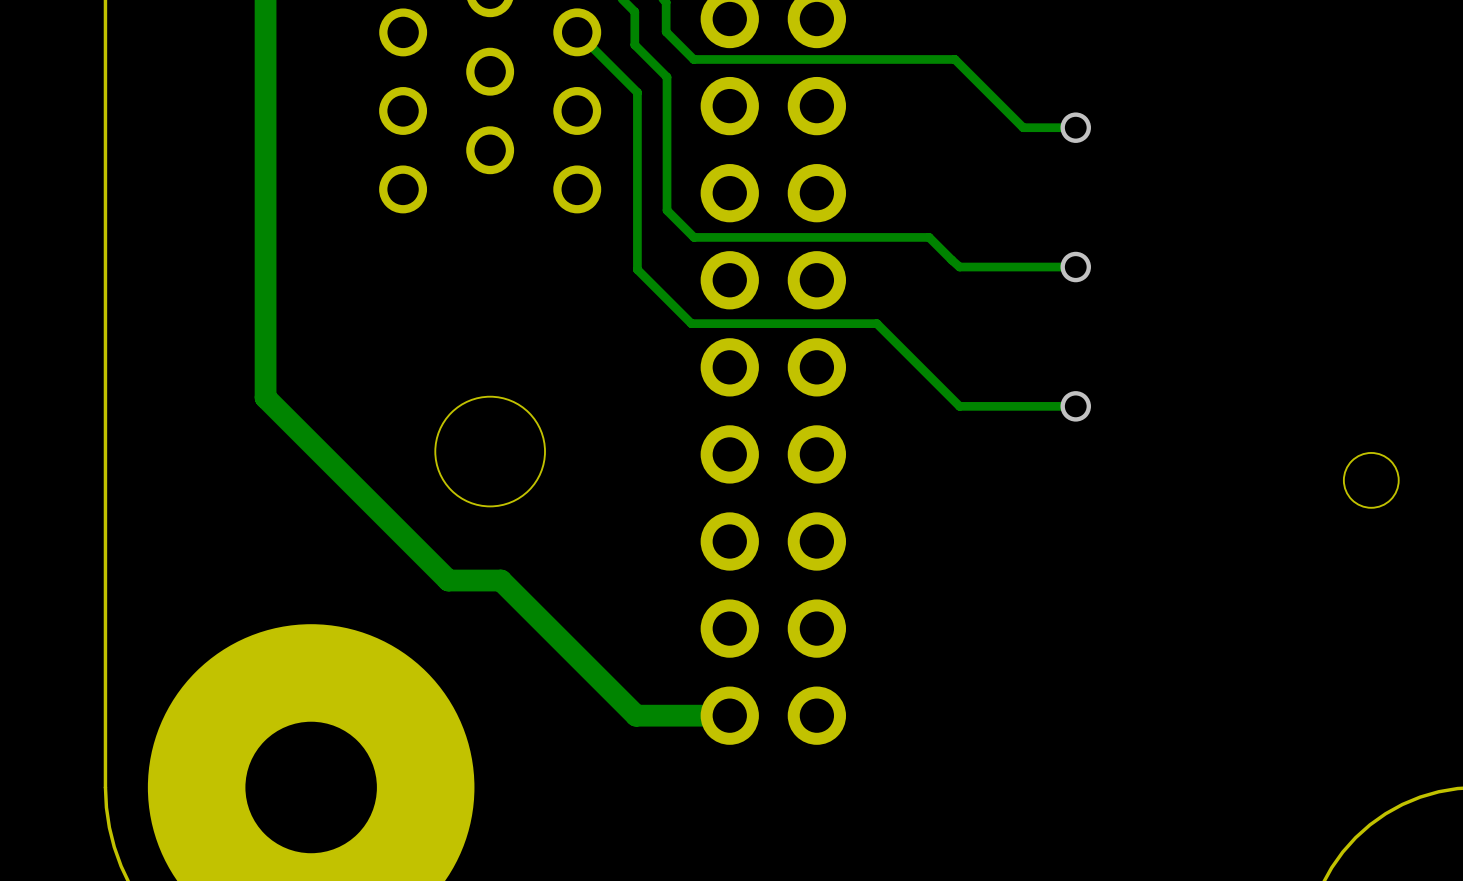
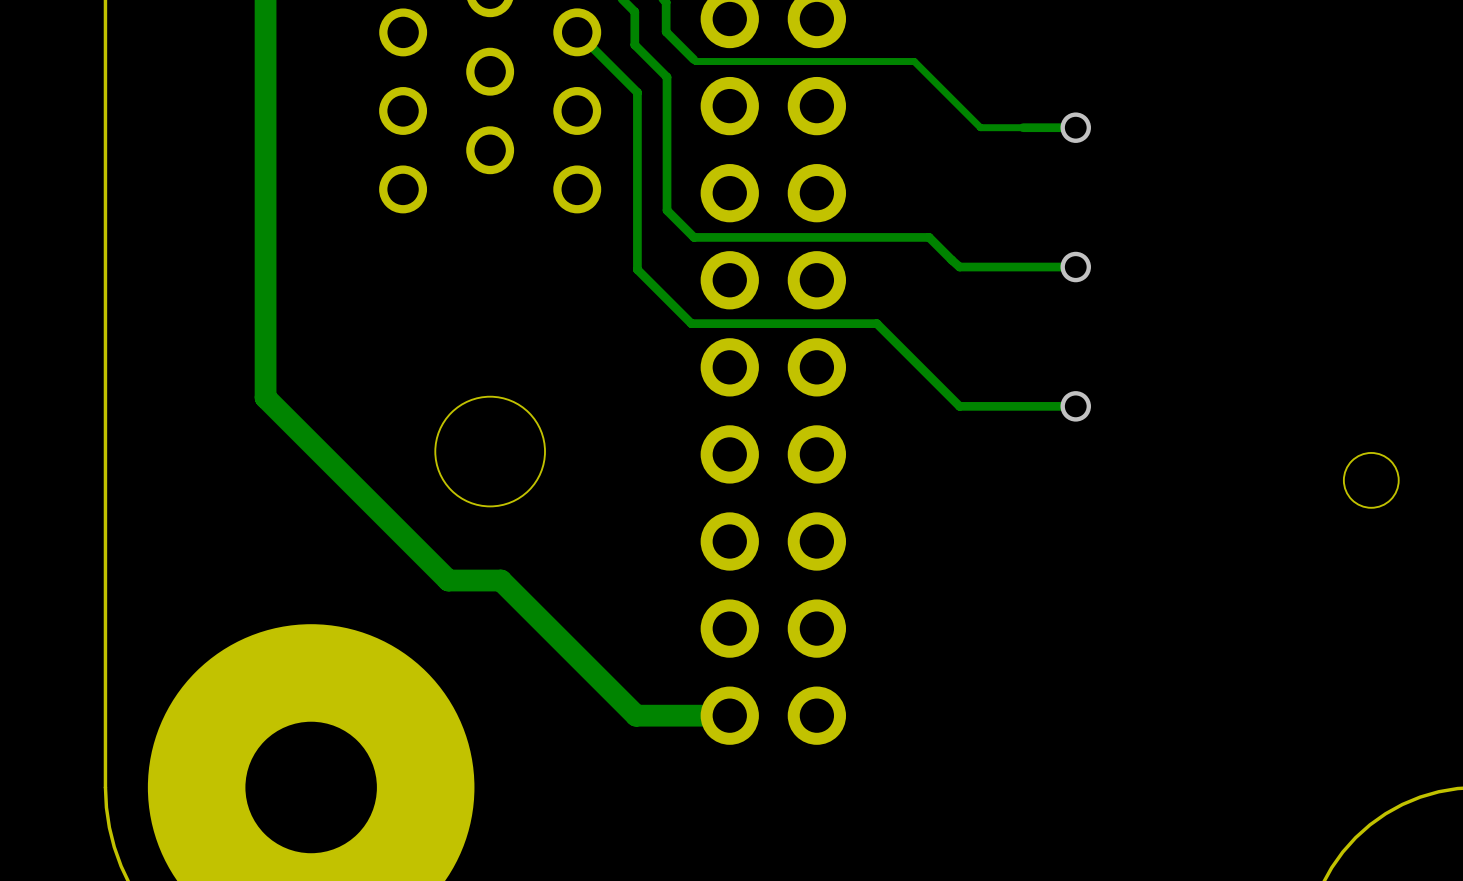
track: (693, 59) (954, 59) (1023, 127) -> (693, 59) (695, 61) (914, 61) (980, 127) (1023, 127)

